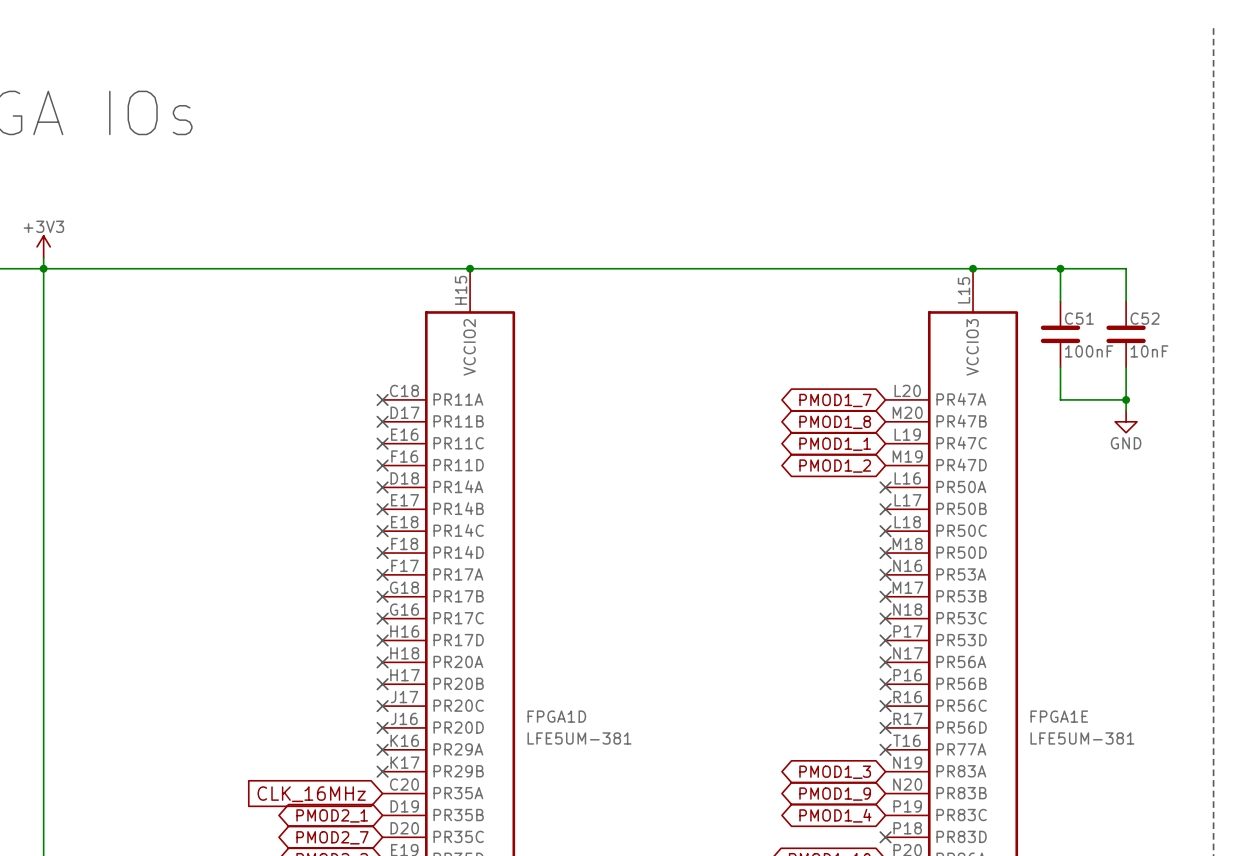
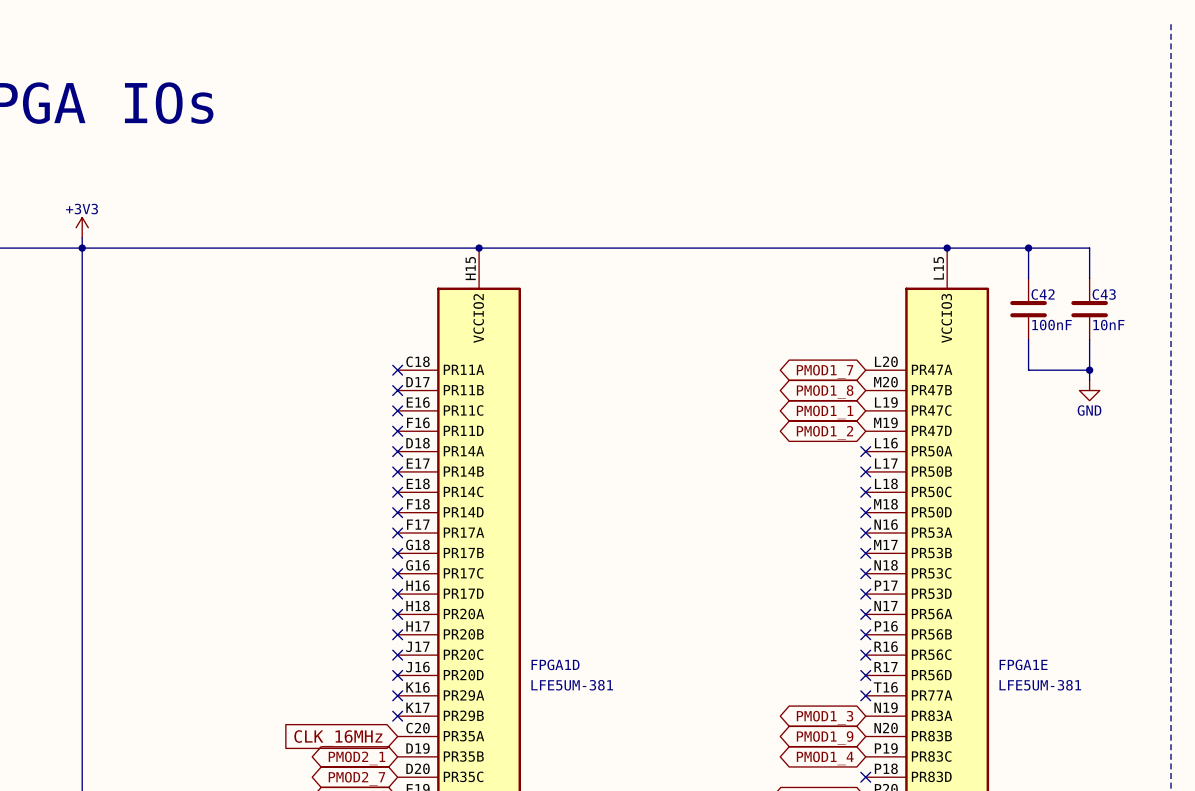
C51 name: C51 (1079, 318) -> C42 (1043, 294)
C52 name: C52 (1145, 318) -> C43 (1104, 294)

